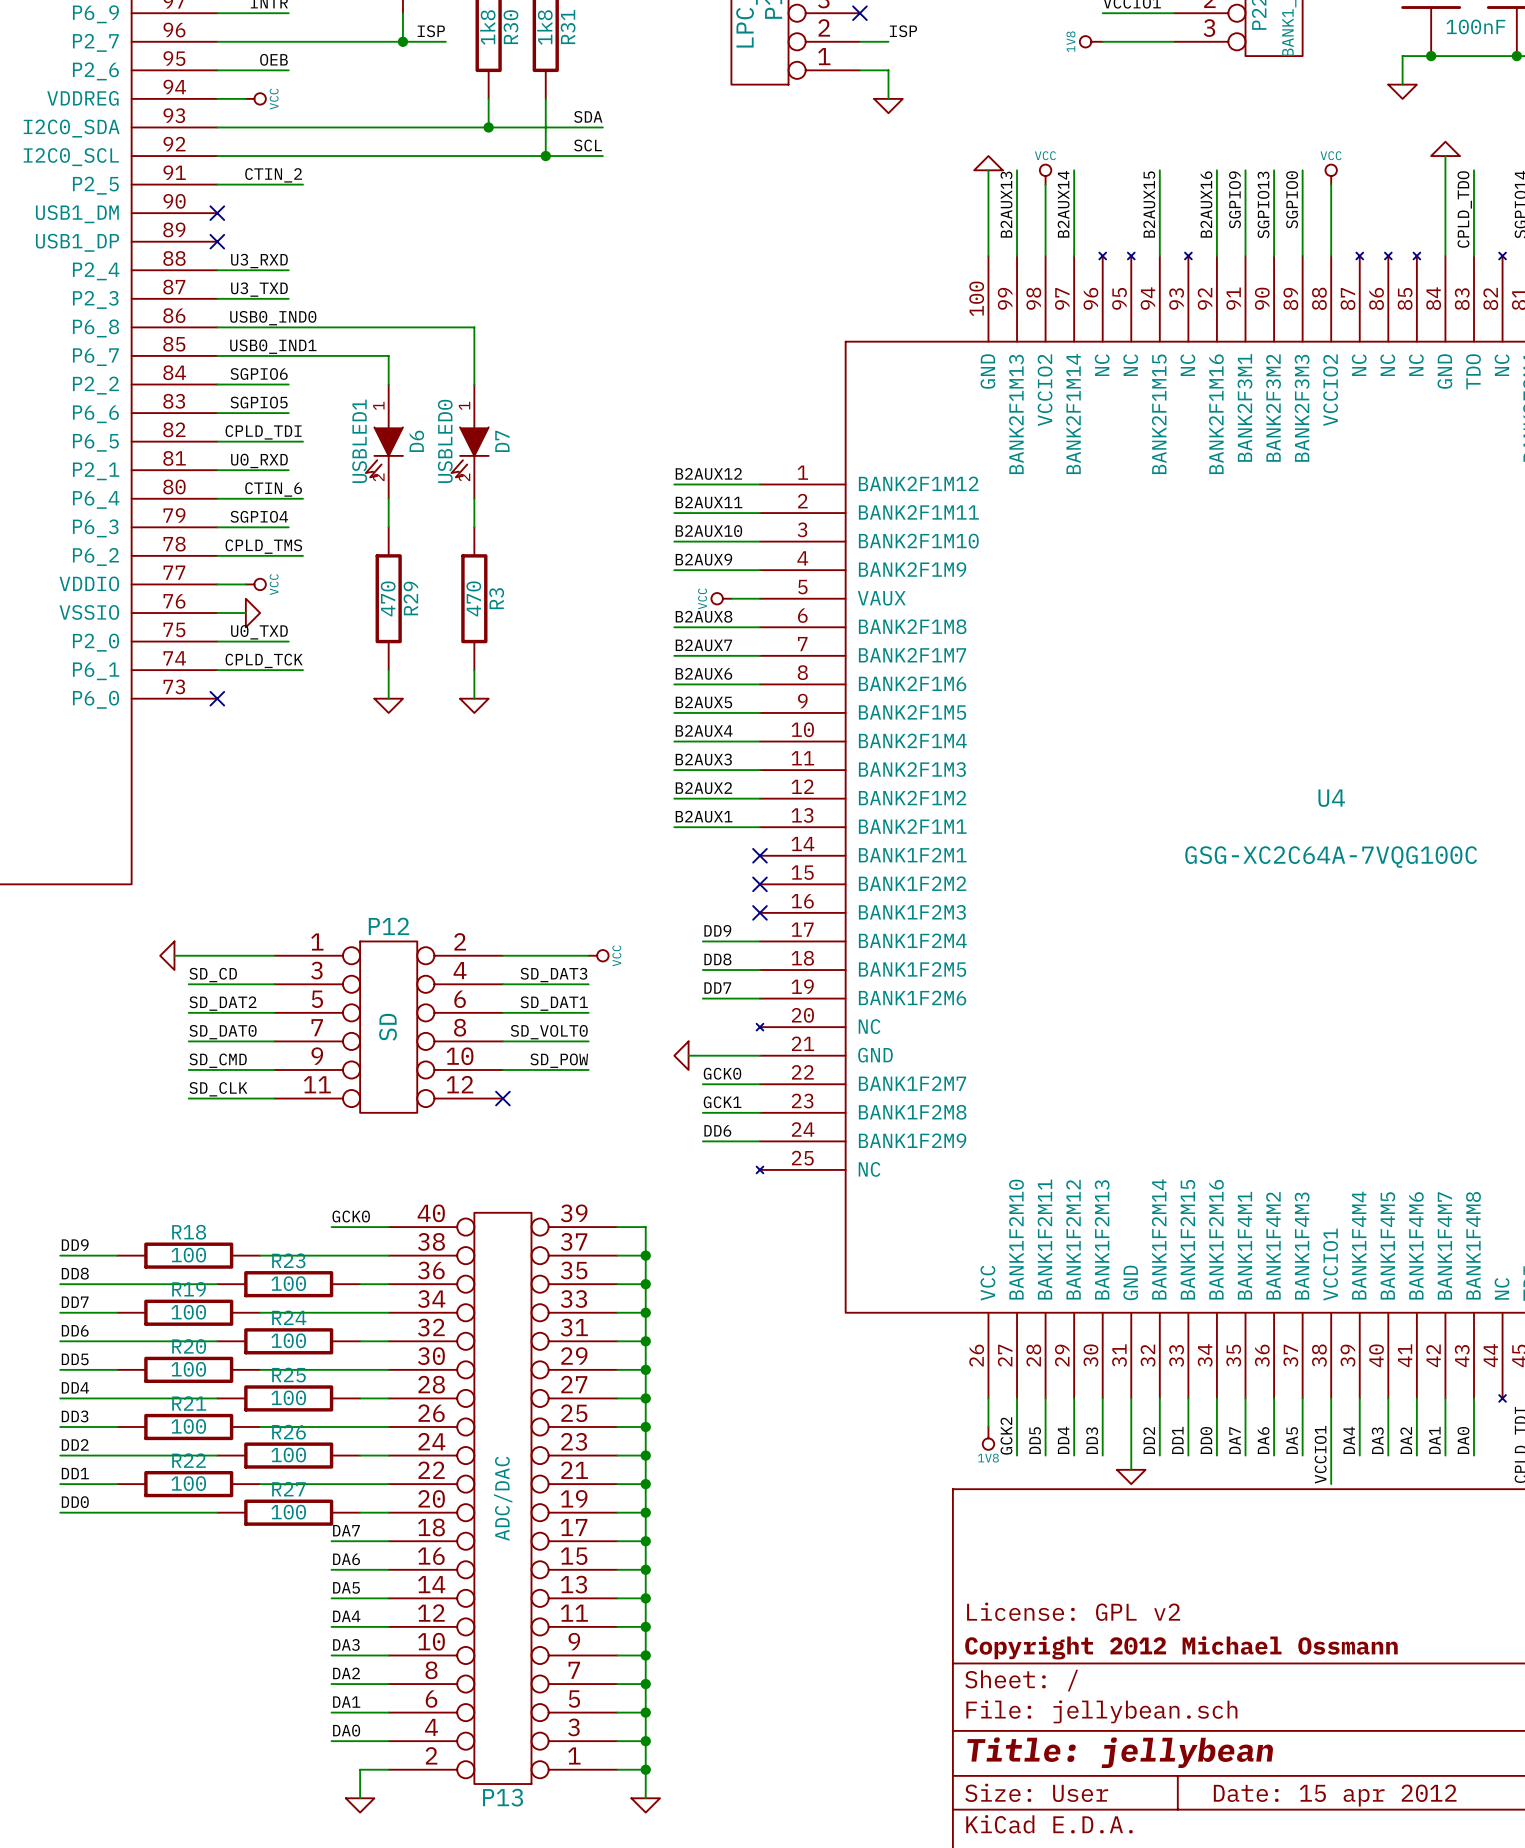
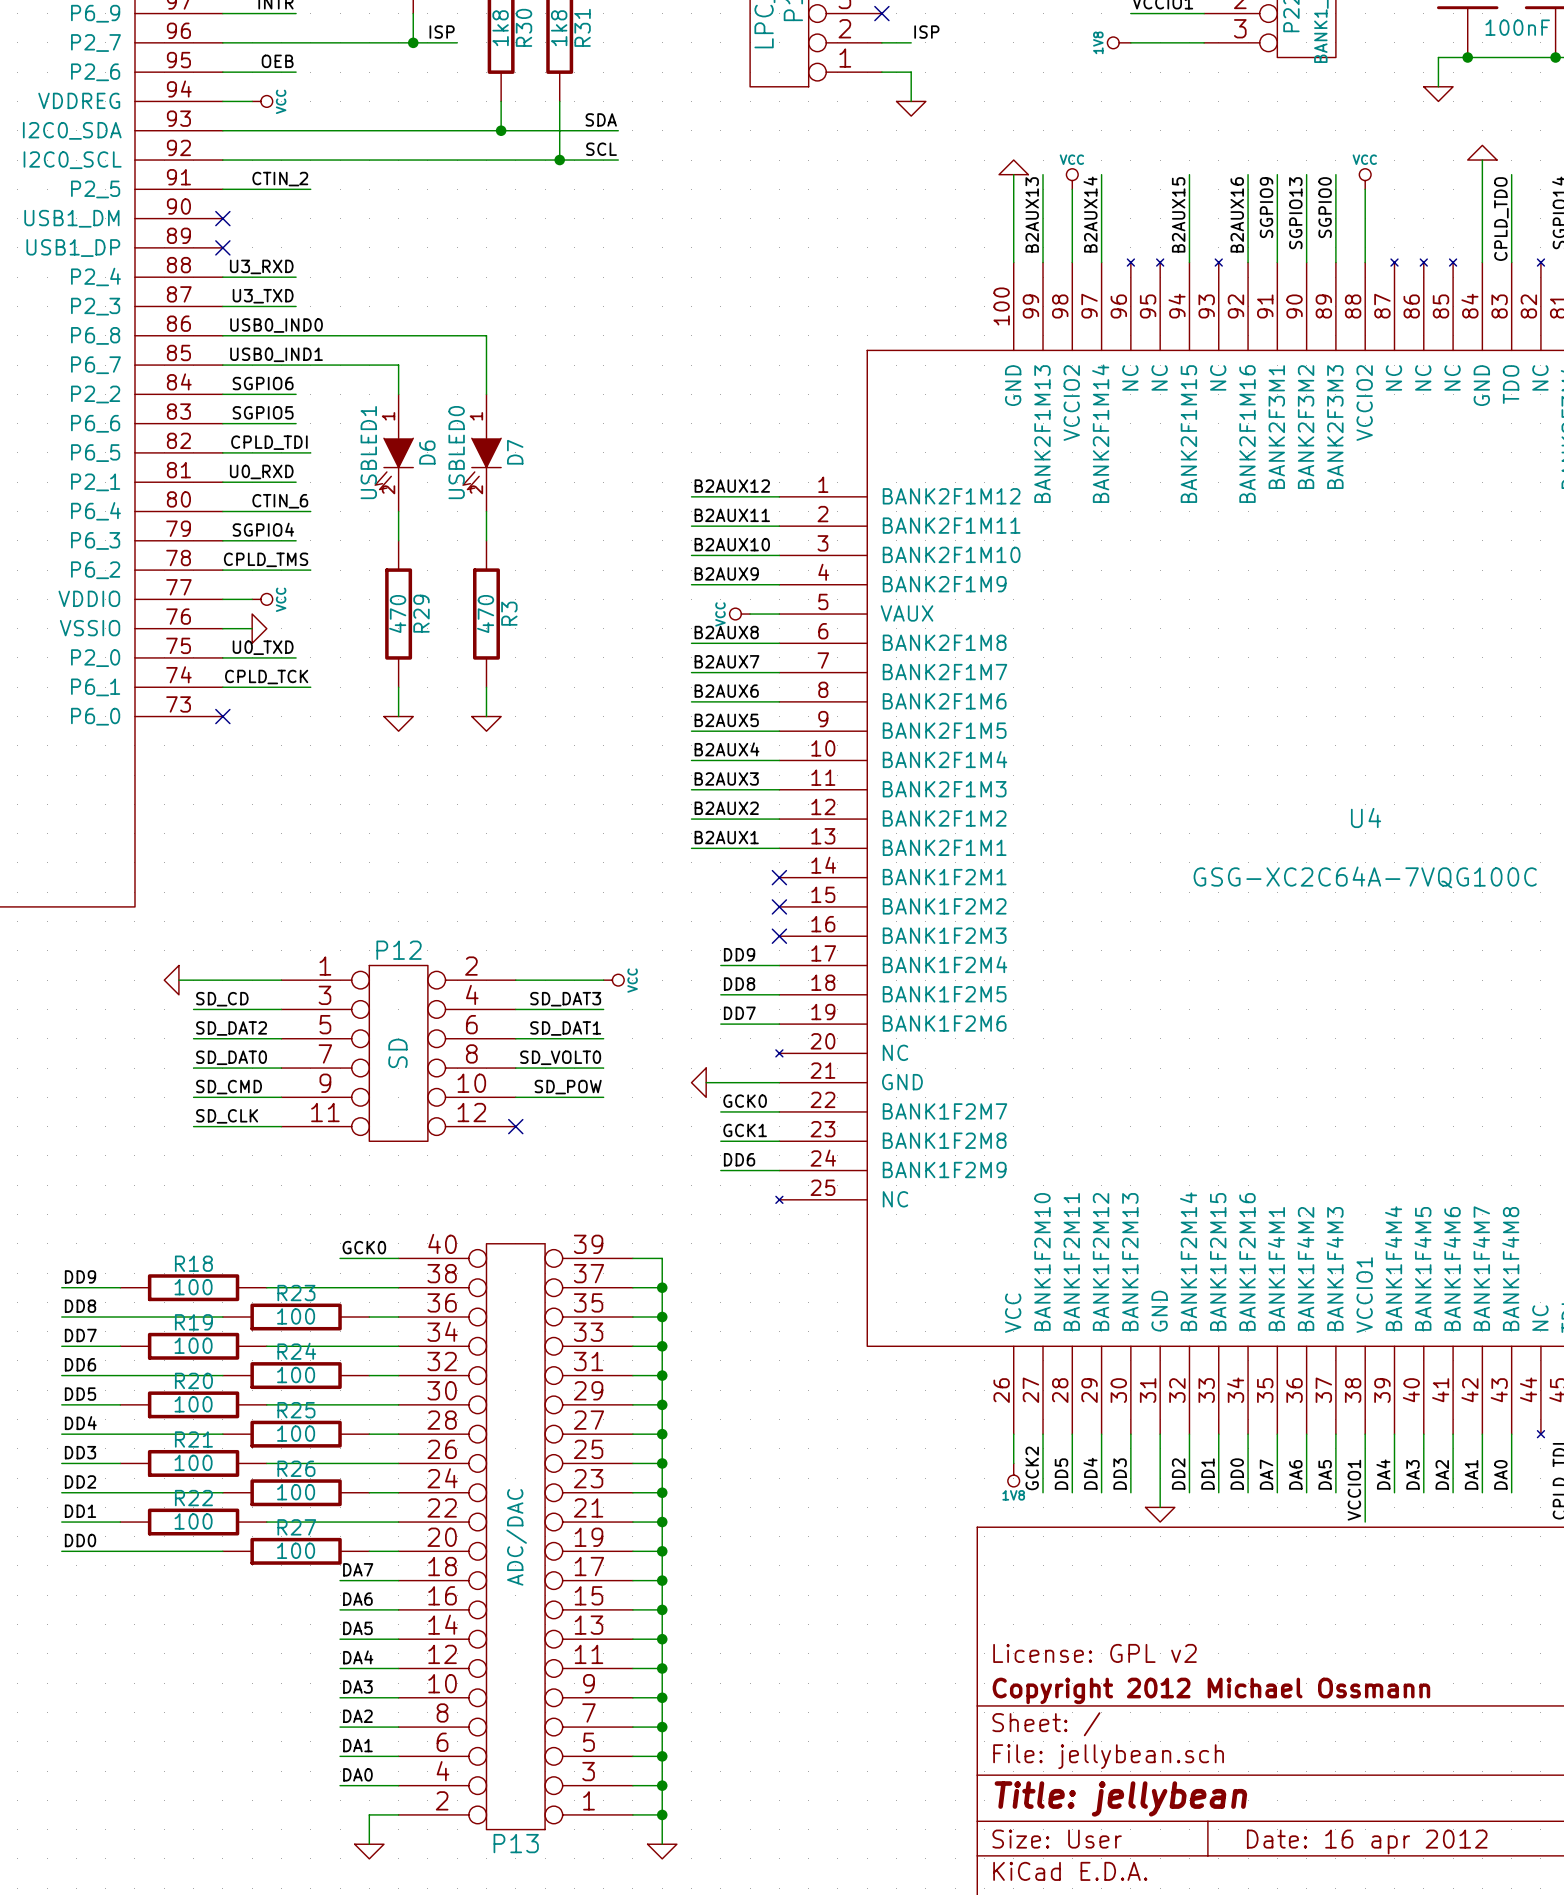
title block: Date: 15 apr 2012 (1335, 1795) -> Date: 16 apr 2012 (1367, 1841)

